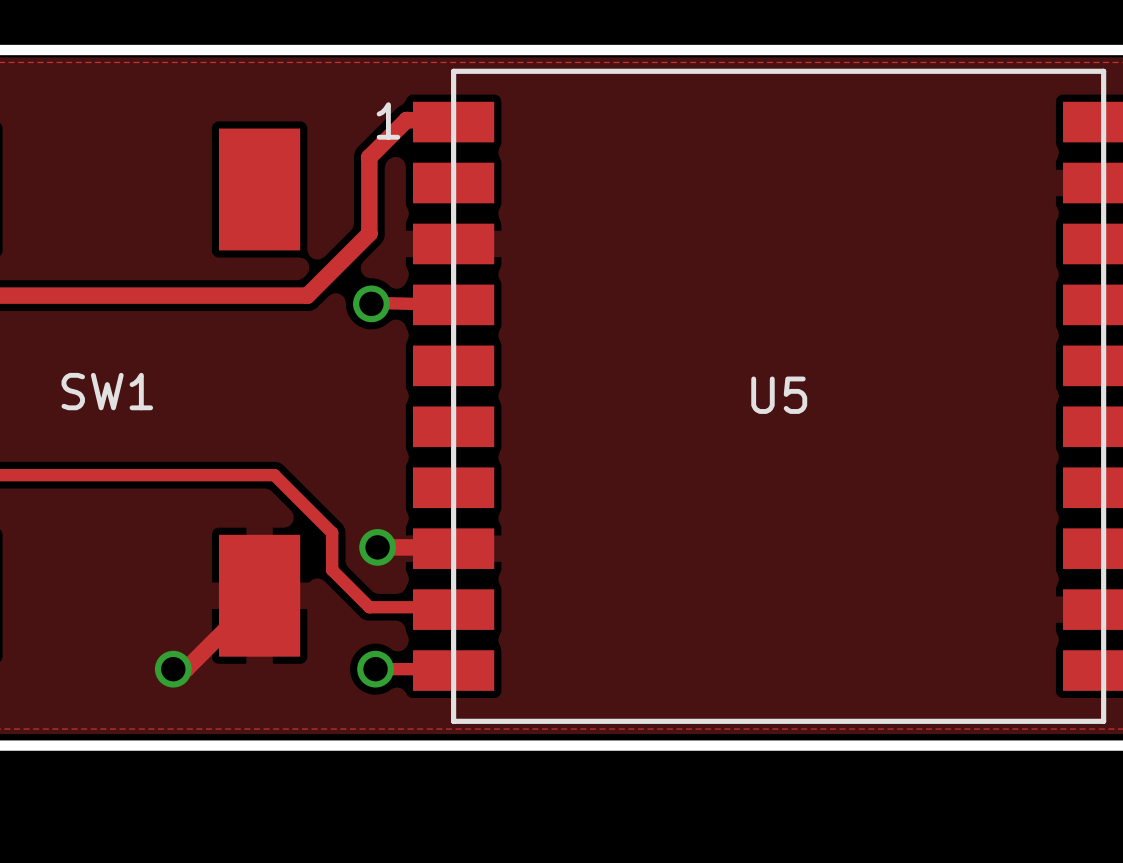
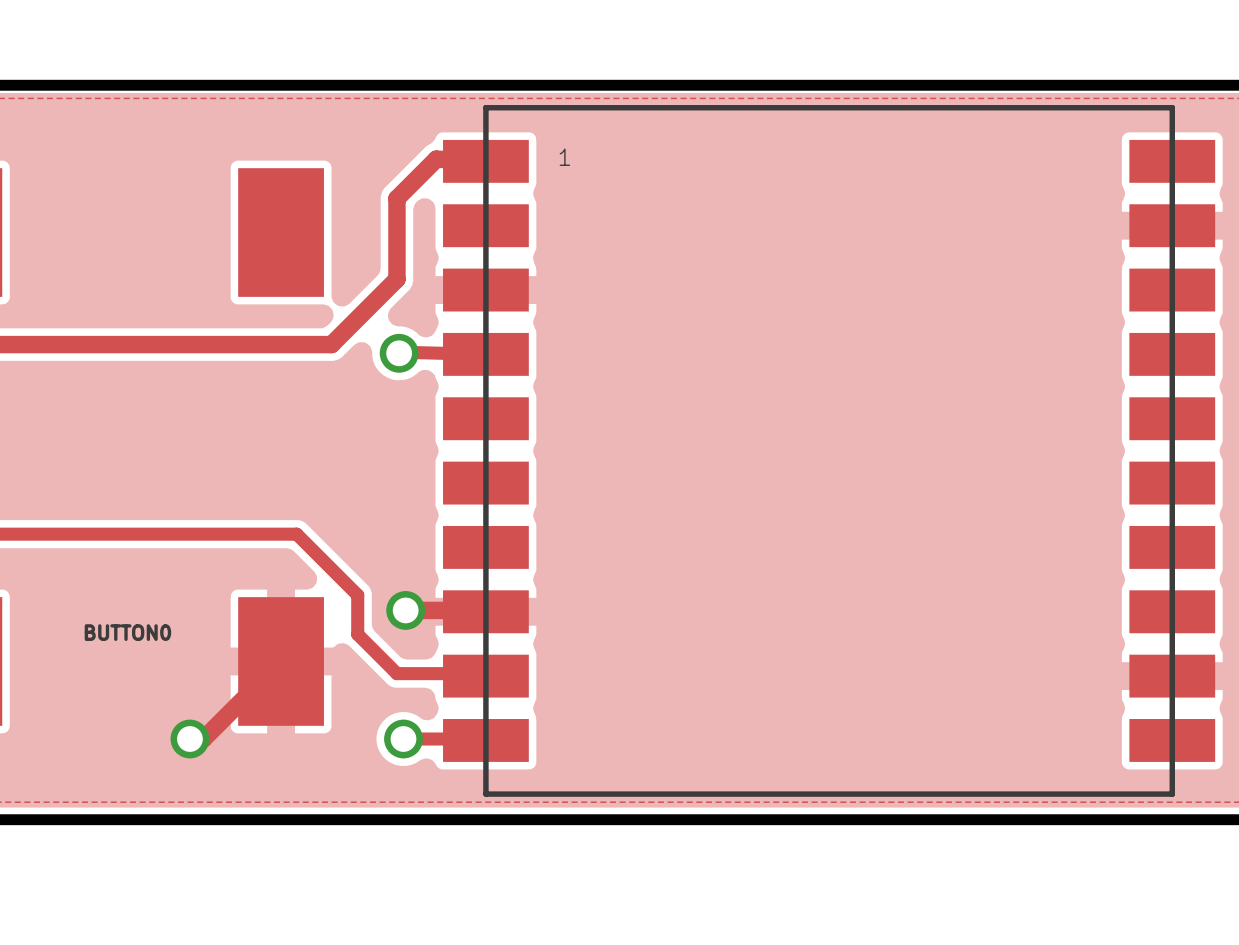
text: none -> 1 (564, 157)
U5 text: 1 (388, 120) -> none
SW1 name: SW1 (107, 391) -> BUTTON0 (127, 632)
U5 name: U5 (779, 395) -> none

